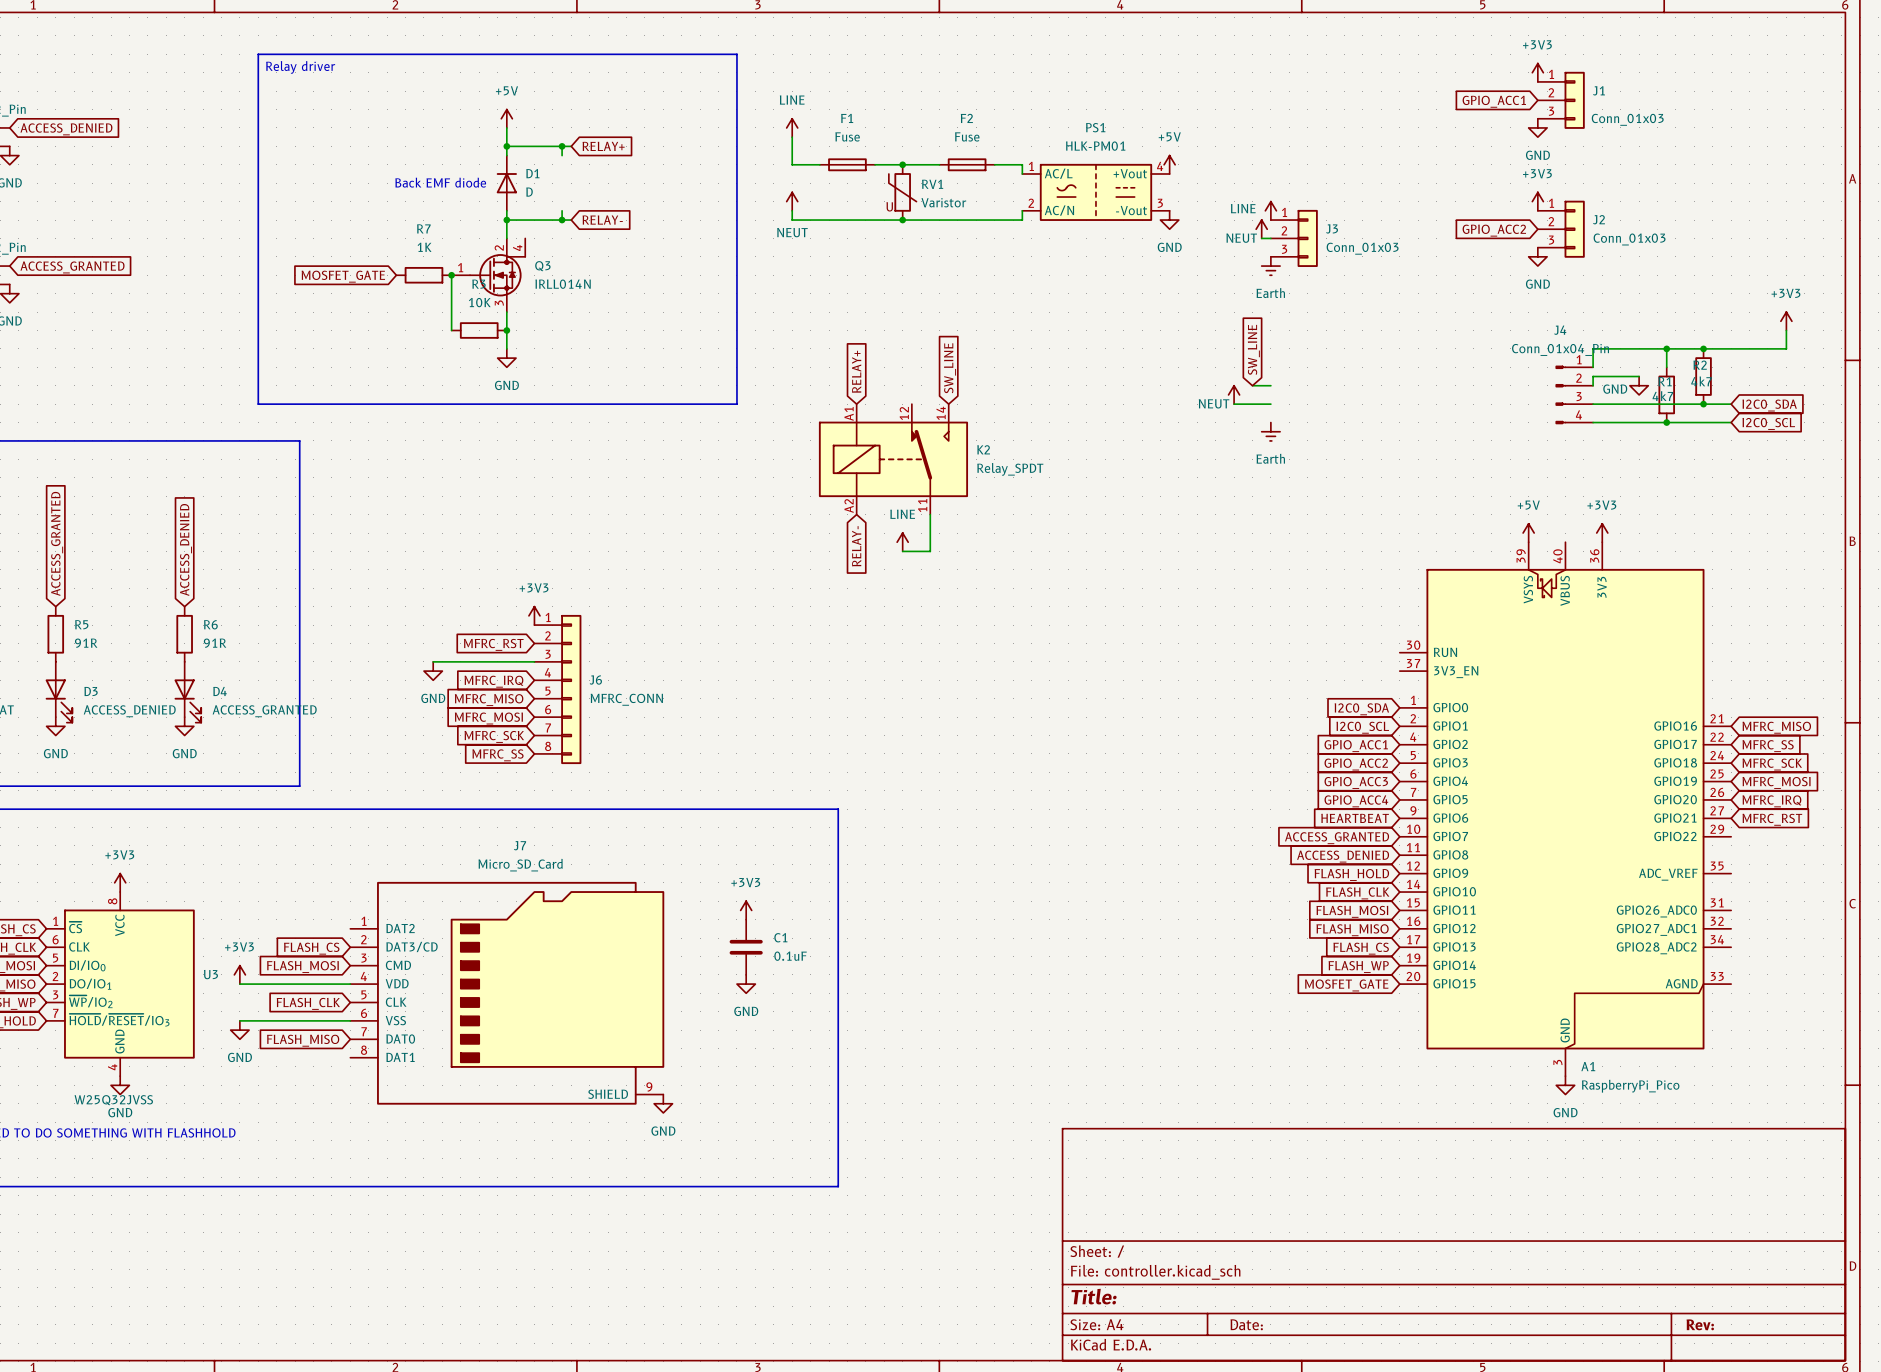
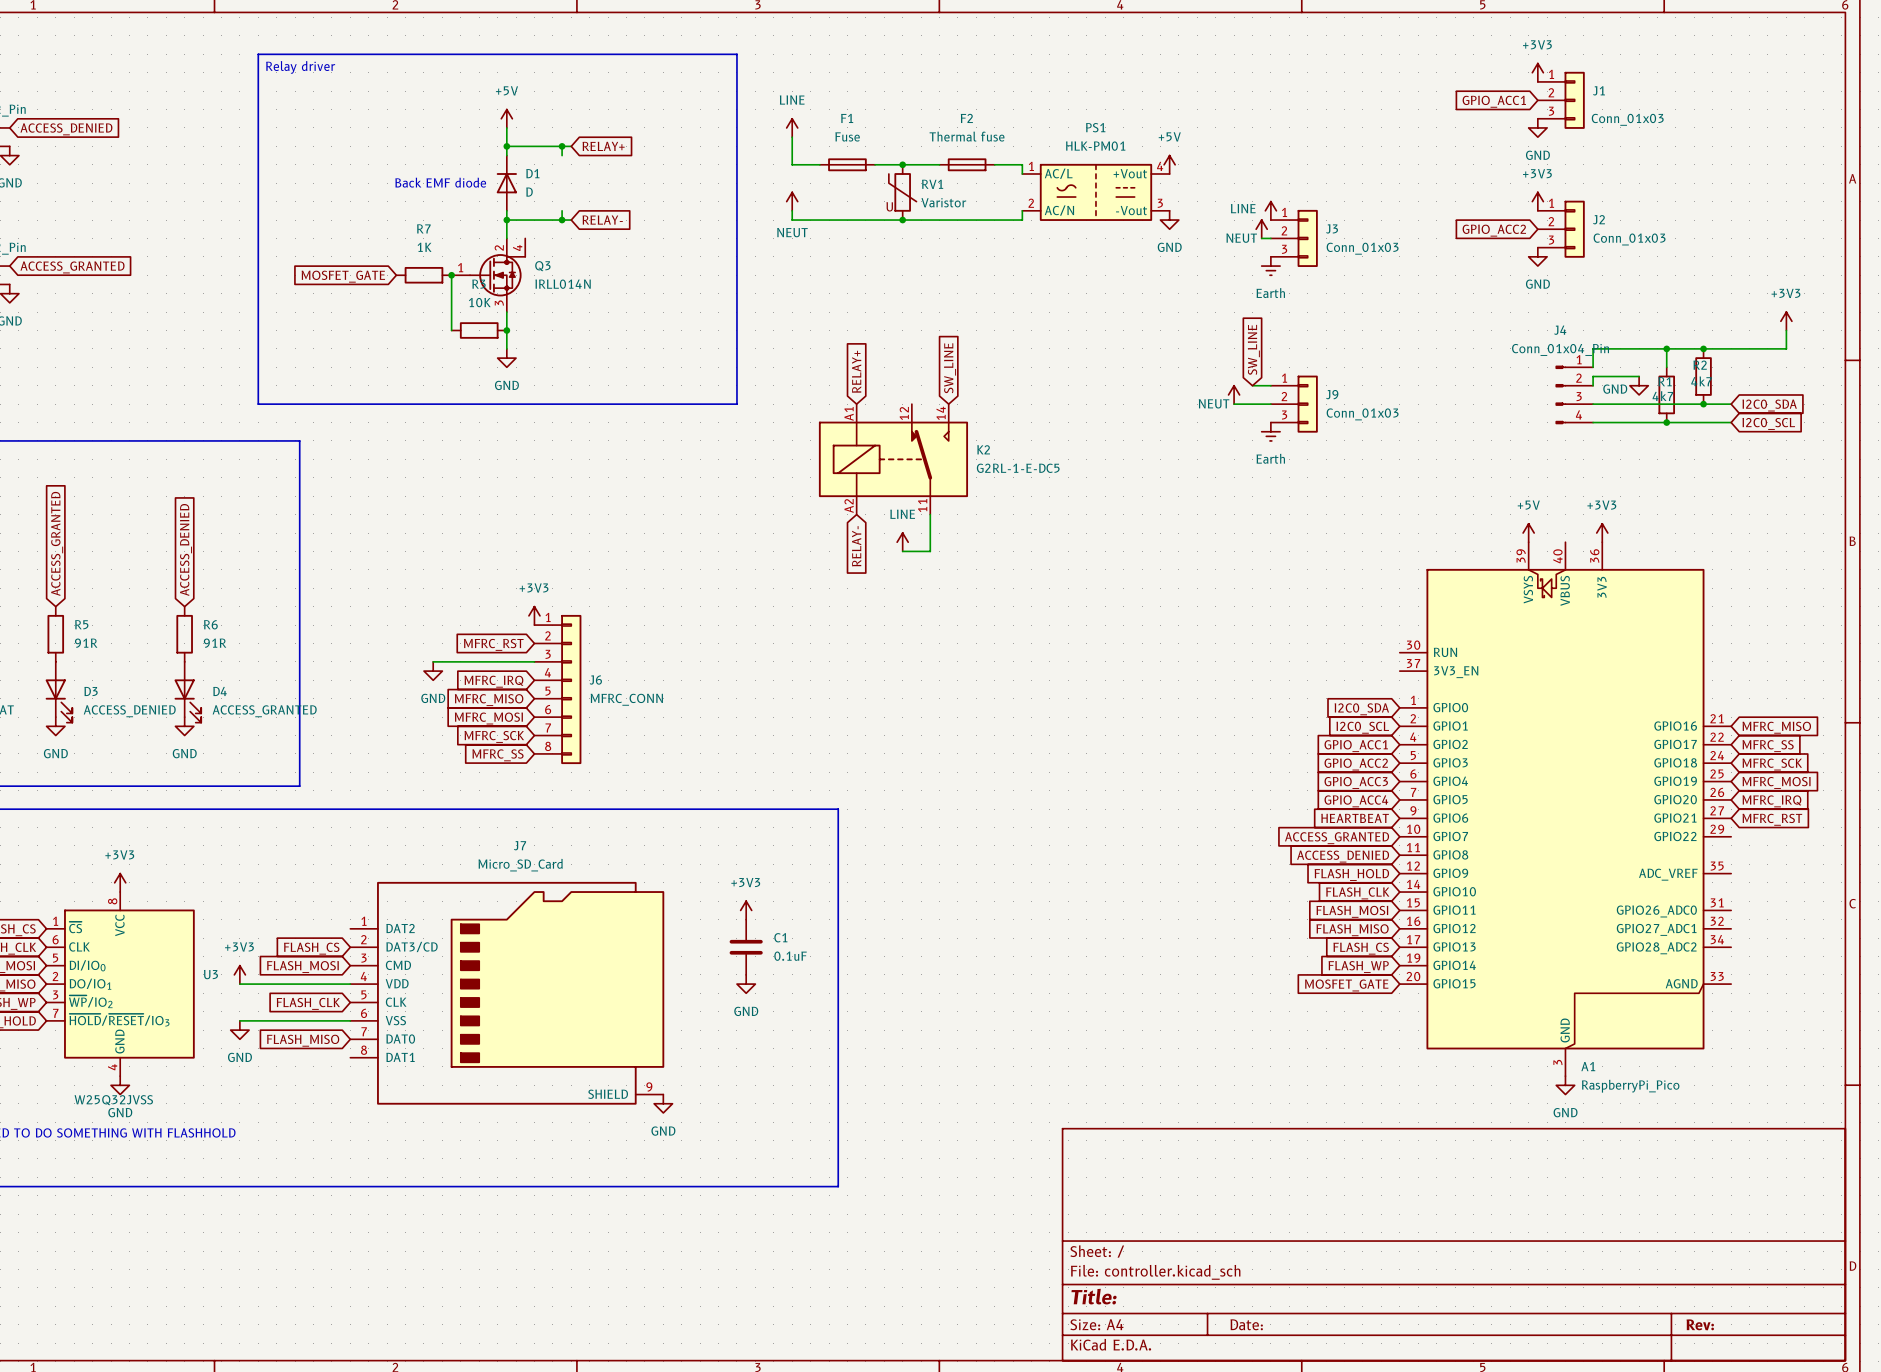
F2 value: Fuse (967, 136) -> Thermal fuse (967, 136)
J9: none -> Conn_01x03 (1294, 404)
K2 value: Relay_SPDT (1010, 469) -> G2RL-1-E-DC5 (1018, 468)

